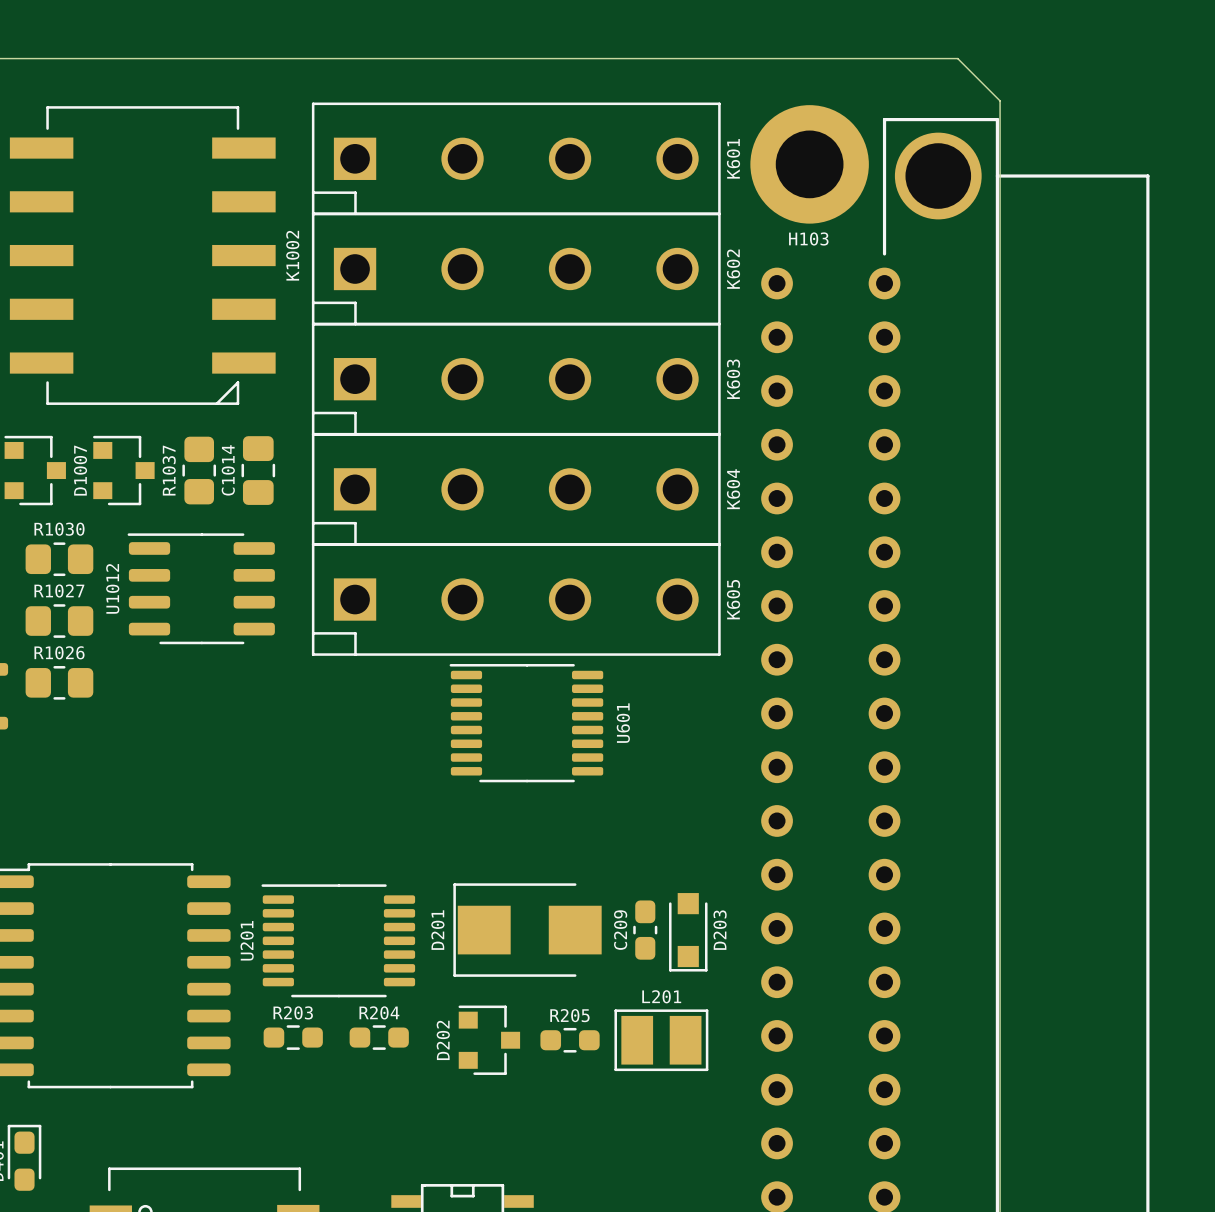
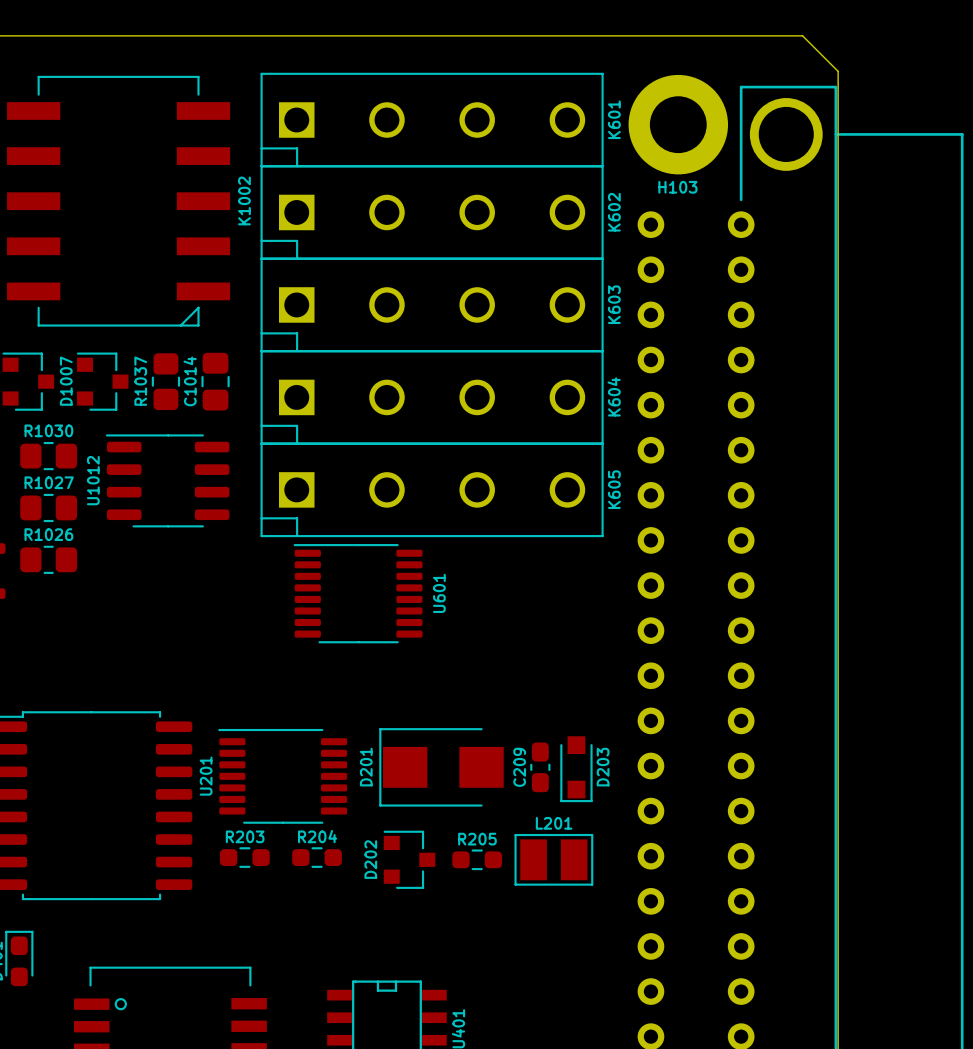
U601 position: (526, 723) -> (358, 593)

